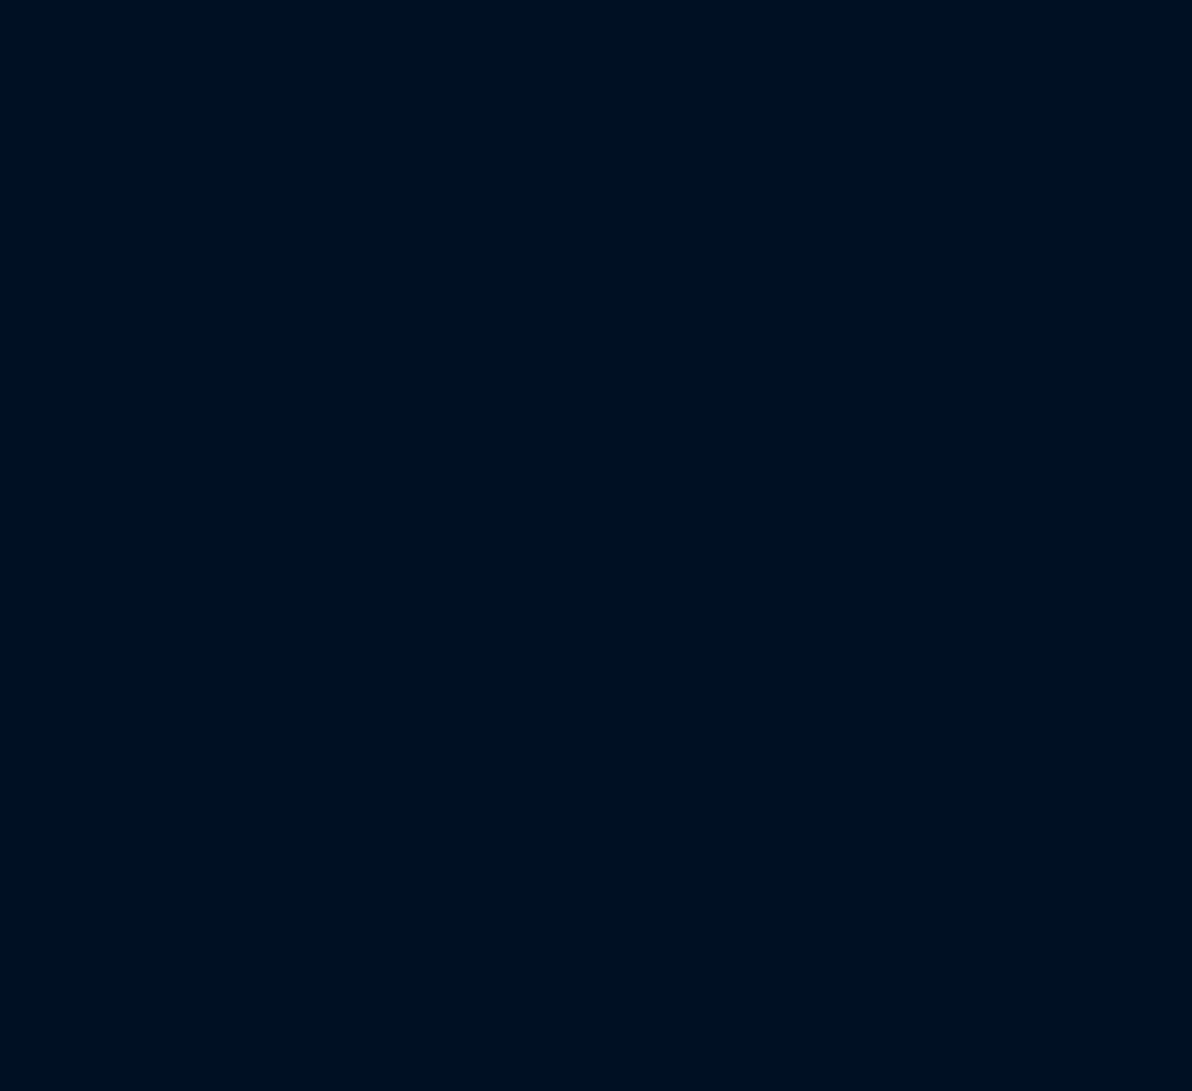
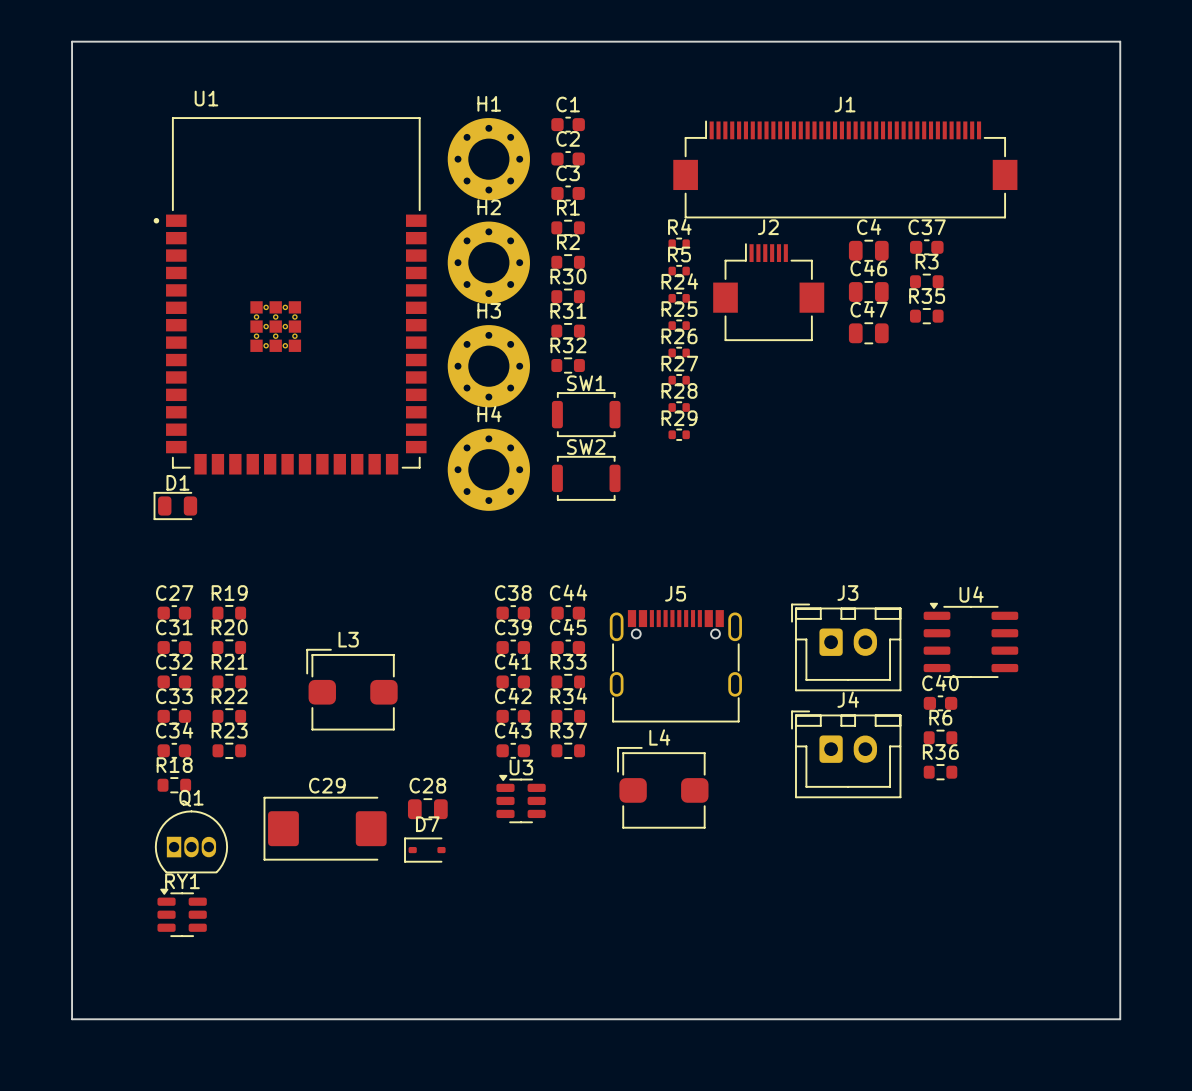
board edge: none -> (72, 41) (1120, 41) (1120, 1019) (72, 1019) (72, 41)
C1: none -> (568, 124)
H1: none -> (488, 159)
C2: none -> (568, 159)
J1: none -> (845, 169)
C3: none -> (568, 193)
R1: none -> (568, 227)
R4: none -> (679, 243)
C37: none -> (926, 247)
C4: none -> (868, 250)
H2: none -> (488, 262)
R2: none -> (568, 262)
R5: none -> (679, 271)
R3: none -> (926, 281)
J2: none -> (768, 292)
C46: none -> (868, 292)
U1: none -> (290, 295)
R30: none -> (568, 296)
R24: none -> (679, 298)
R35: none -> (926, 316)
R25: none -> (679, 325)
R31: none -> (568, 331)
C47: none -> (868, 333)
R26: none -> (679, 352)
R32: none -> (568, 365)
H3: none -> (488, 366)
R27: none -> (679, 380)
R28: none -> (679, 407)
SW1: none -> (586, 414)
R29: none -> (679, 434)
H4: none -> (488, 469)
SW2: none -> (586, 478)
D1: none -> (175, 505)
C27: none -> (174, 613)
R19: none -> (229, 613)
C38: none -> (513, 613)
C44: none -> (568, 613)
U4: none -> (970, 640)
C31: none -> (174, 647)
R20: none -> (229, 647)
C39: none -> (513, 647)
C45: none -> (568, 647)
J3: none -> (846, 647)
J5: none -> (675, 666)
C32: none -> (174, 681)
R21: none -> (229, 681)
C41: none -> (513, 681)
R33: none -> (568, 681)
L3: none -> (352, 689)
C40: none -> (940, 703)
C33: none -> (174, 716)
R22: none -> (229, 716)
C42: none -> (513, 716)
R34: none -> (568, 716)
R6: none -> (940, 737)
C34: none -> (174, 750)
R23: none -> (229, 750)
C43: none -> (513, 750)
R37: none -> (568, 750)
J4: none -> (846, 754)
R36: none -> (940, 772)
R18: none -> (174, 785)
L4: none -> (662, 787)
U3: none -> (521, 799)
C28: none -> (427, 809)
C29: none -> (325, 828)
Q1: none -> (191, 841)
D7: none -> (424, 850)
RY1: none -> (182, 912)

